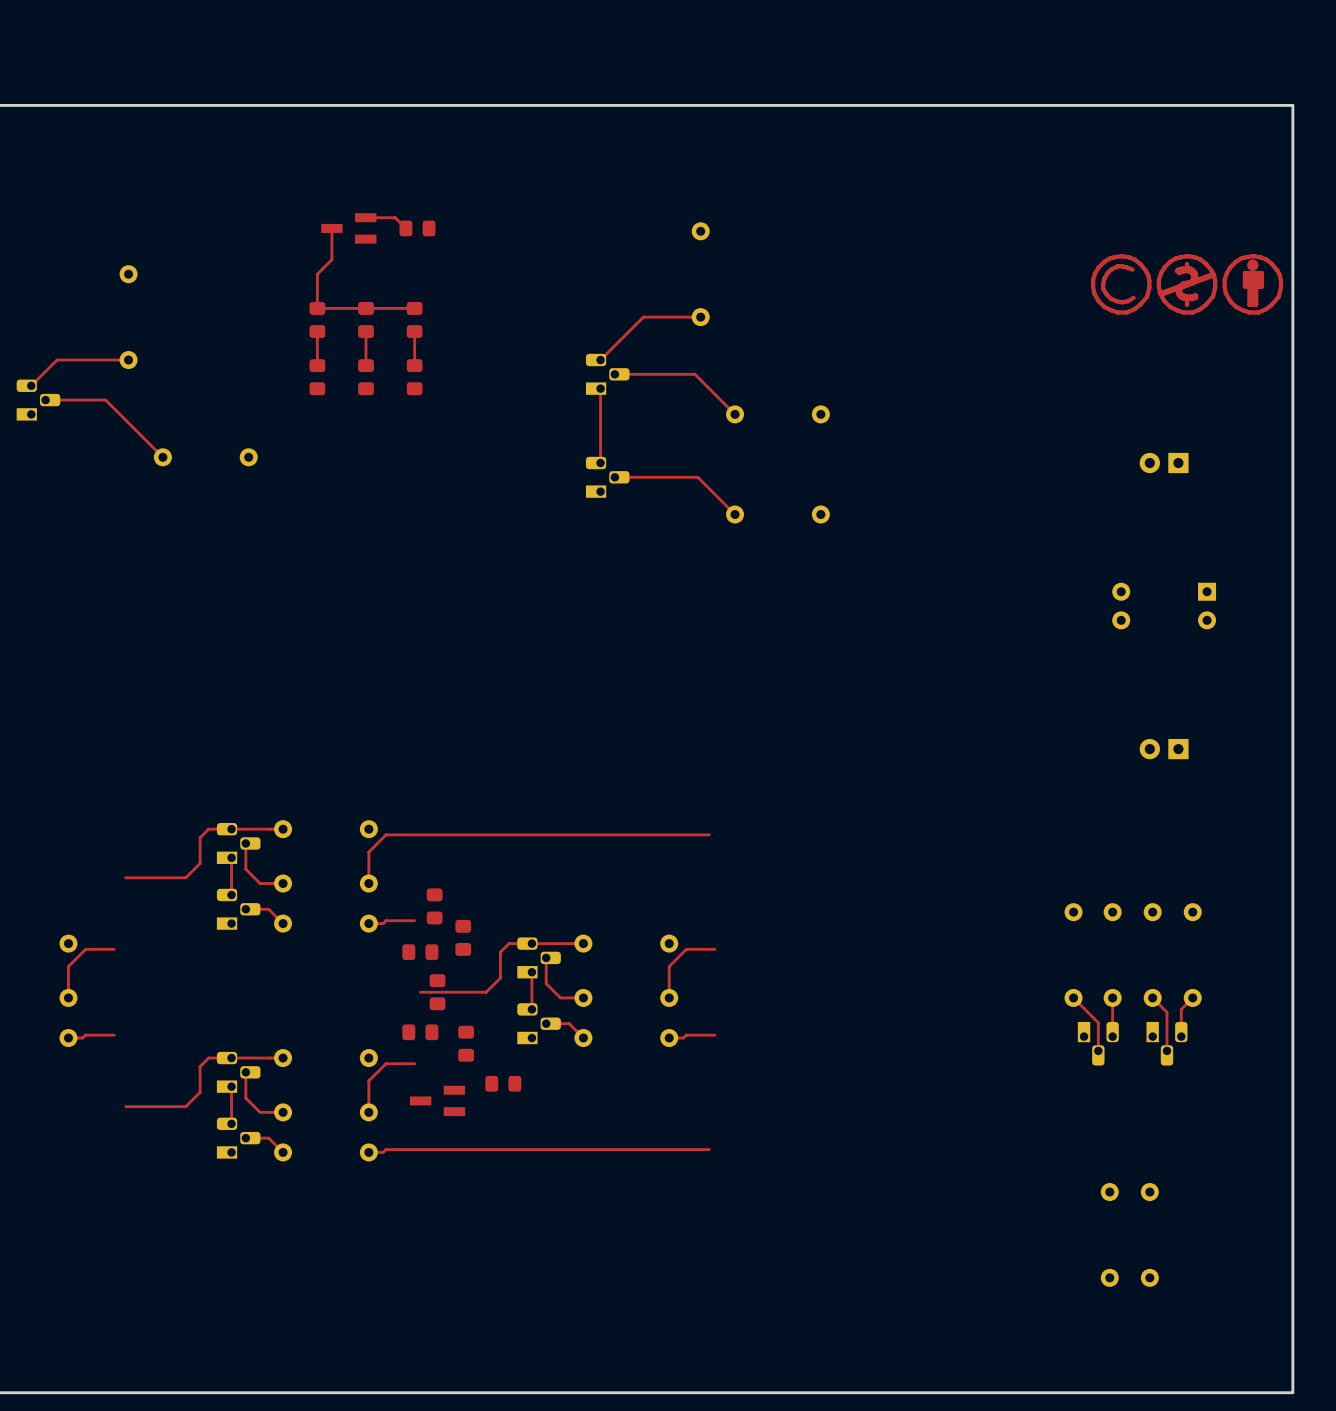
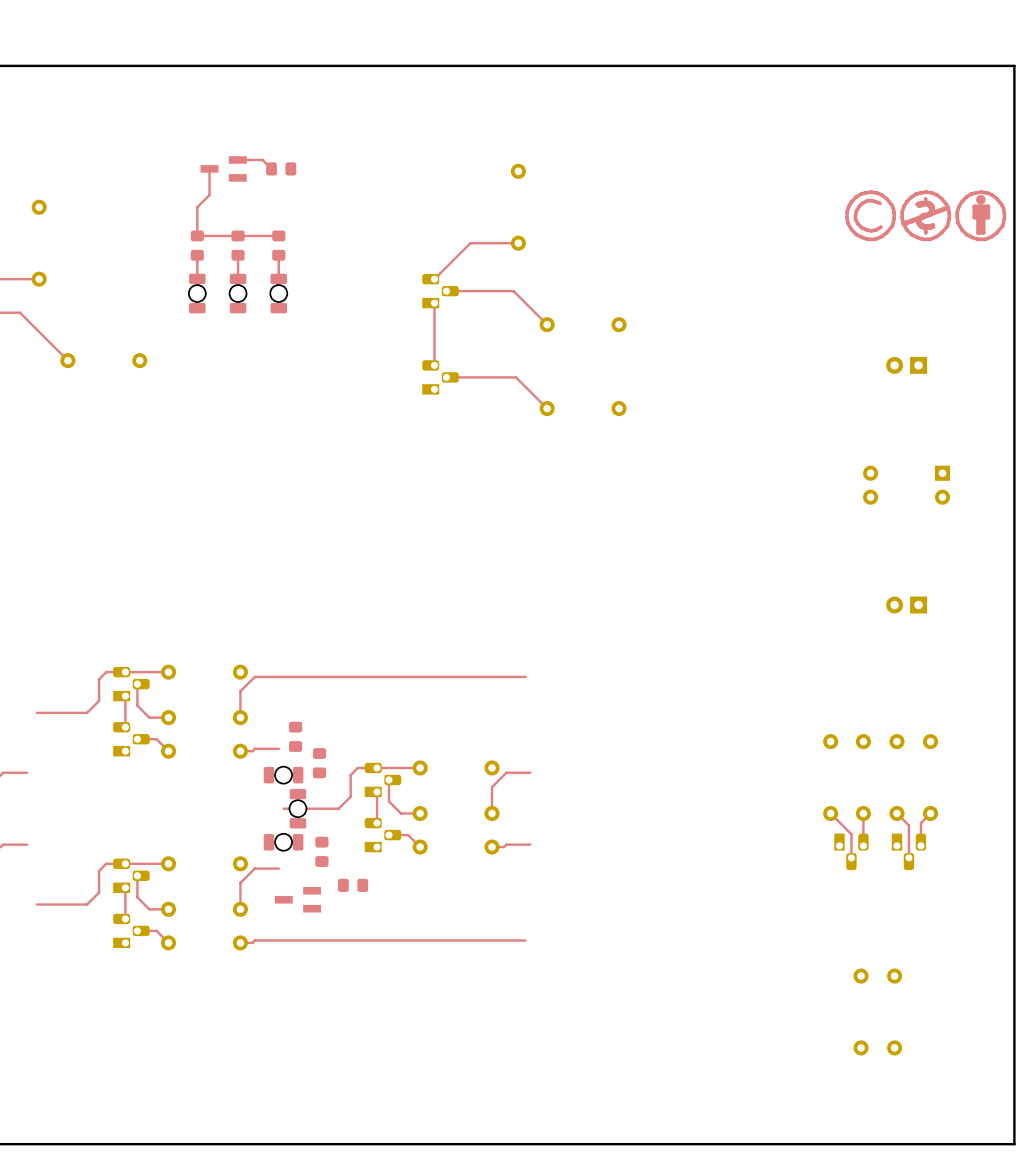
part footprint: [309, 359, 326, 396] -> [188, 273, 206, 314]
part footprint: [358, 359, 374, 396] -> [229, 273, 247, 314]
part footprint: [406, 359, 423, 396] -> [270, 273, 288, 314]
part footprint: [402, 944, 439, 961] -> [263, 766, 304, 784]
part footprint: [429, 974, 446, 1011] -> [289, 788, 307, 829]
part footprint: [402, 1024, 439, 1041] -> [263, 833, 304, 851]

